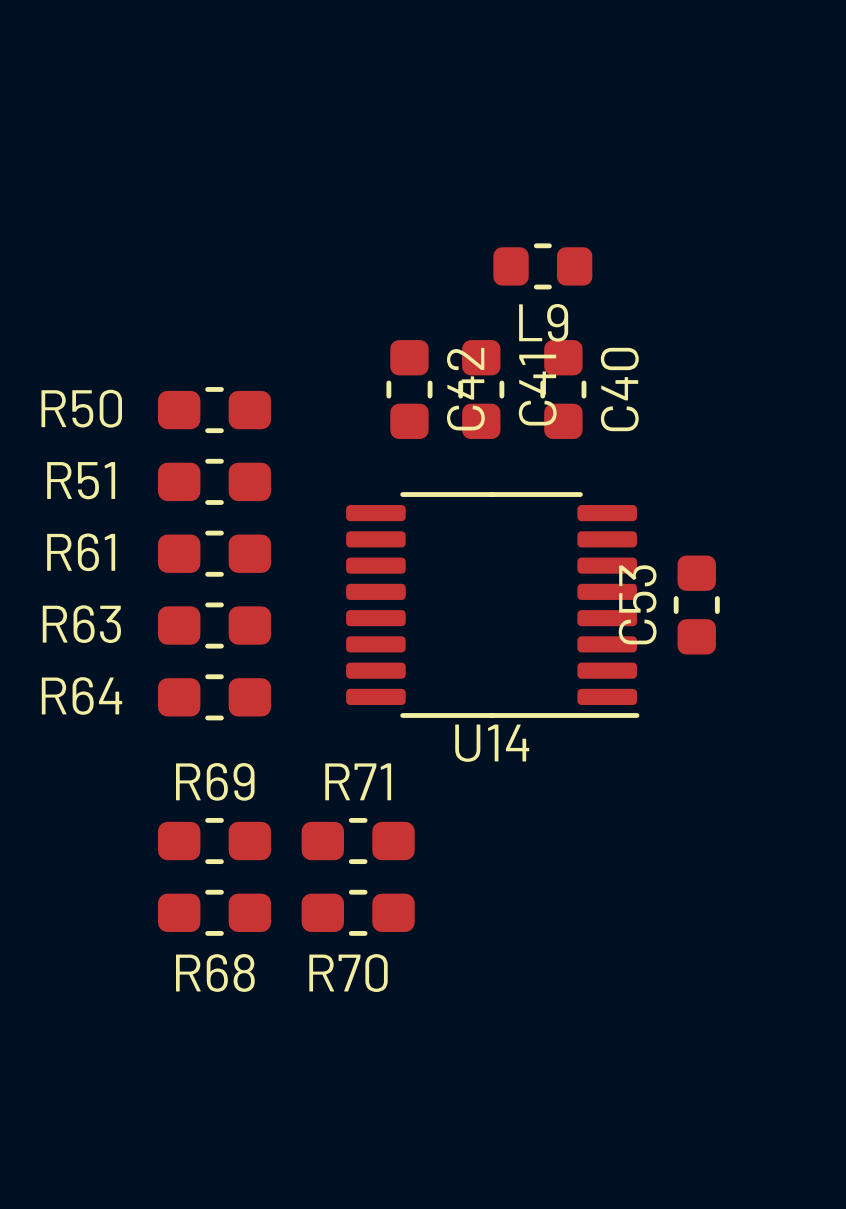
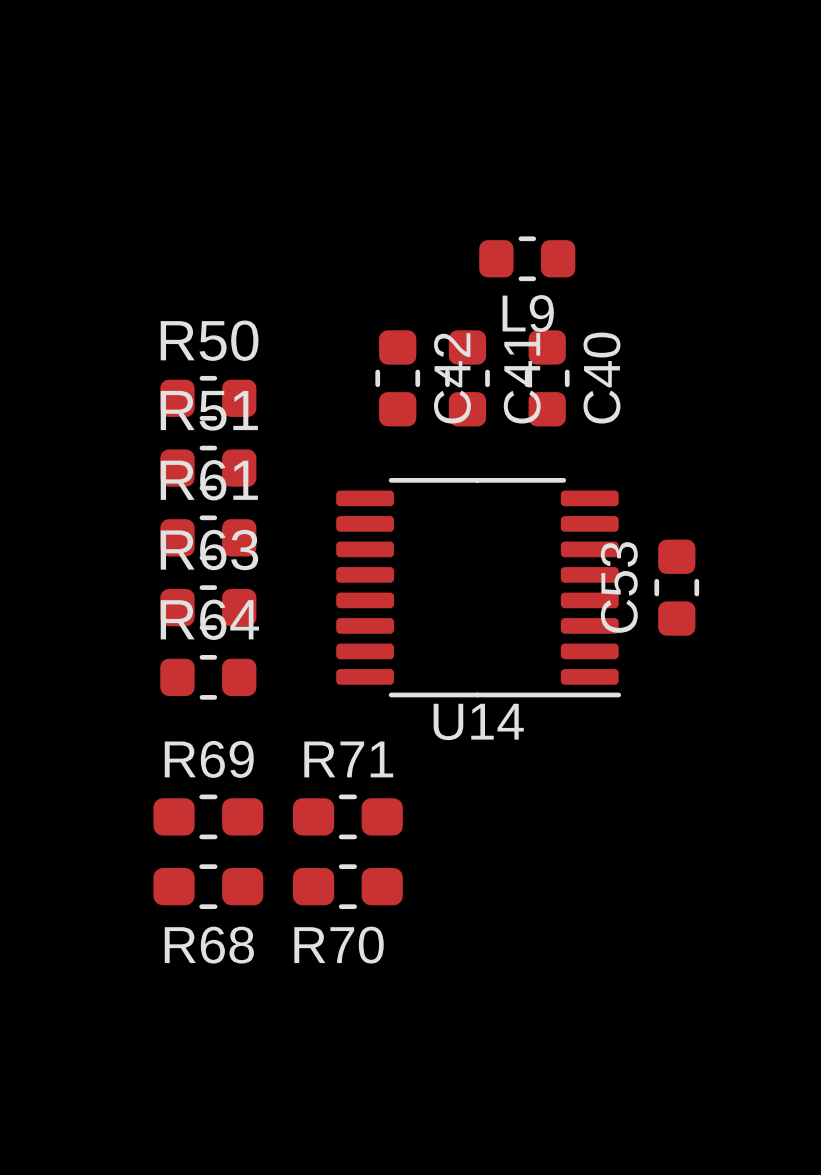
R50 footprint: [157, 387, 272, 434] -> [160, 375, 257, 421]
R50 name position: R50 (81, 408) -> R50 (209, 340)
R51 footprint: [157, 458, 272, 505] -> [160, 445, 257, 491]
R51 name position: R51 (81, 480) -> R51 (209, 410)
R61 footprint: [157, 530, 272, 577] -> [160, 515, 257, 561]
R61 name position: R61 (81, 552) -> R61 (209, 480)
R63 footprint: [157, 602, 272, 649] -> [160, 585, 257, 630]
R63 name position: R63 (81, 624) -> R63 (209, 550)
R64 footprint: [157, 674, 272, 721] -> [160, 654, 257, 700]
R64 name position: R64 (81, 695) -> R64 (209, 619)

